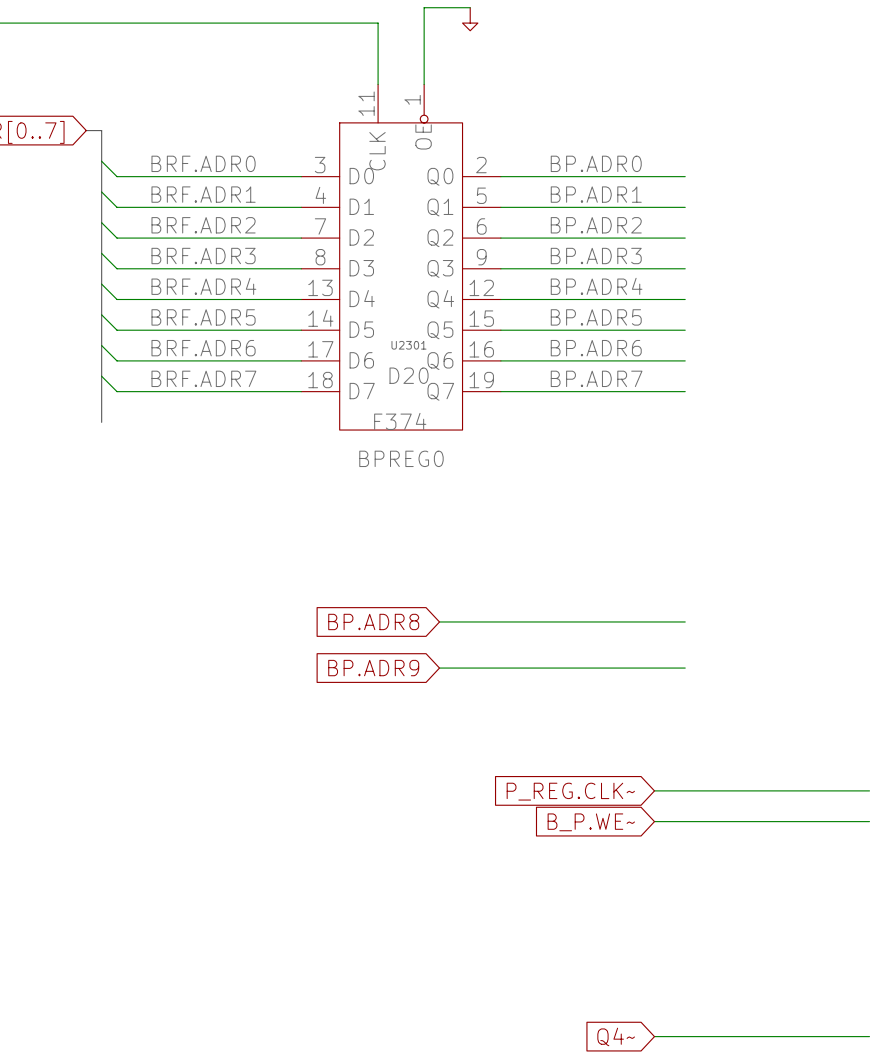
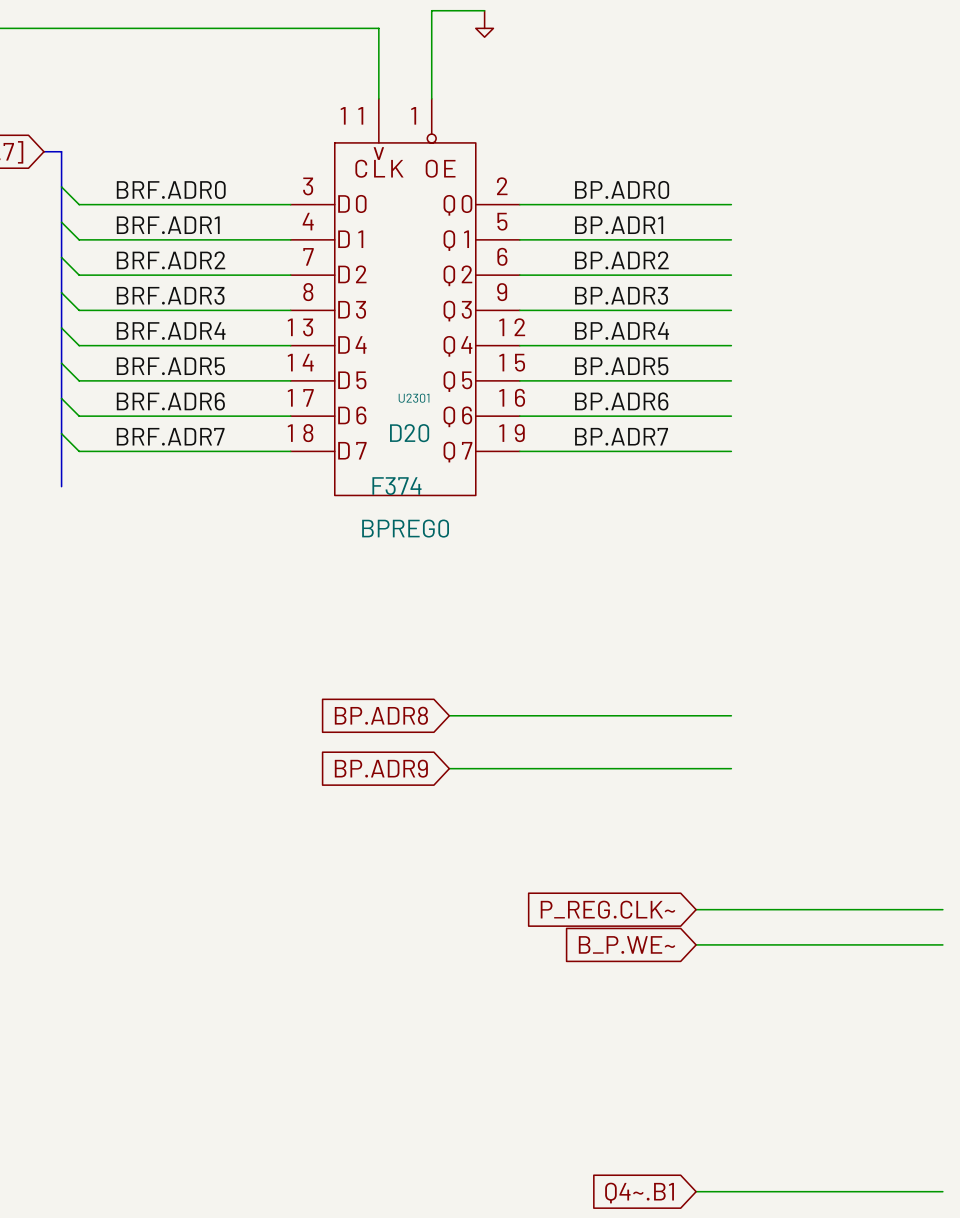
U2301 symbol: [301, 84, 501, 431] -> [290, 98, 520, 496]
global label: Q4~ (616, 1036) -> Q4~.B1 (639, 1193)

